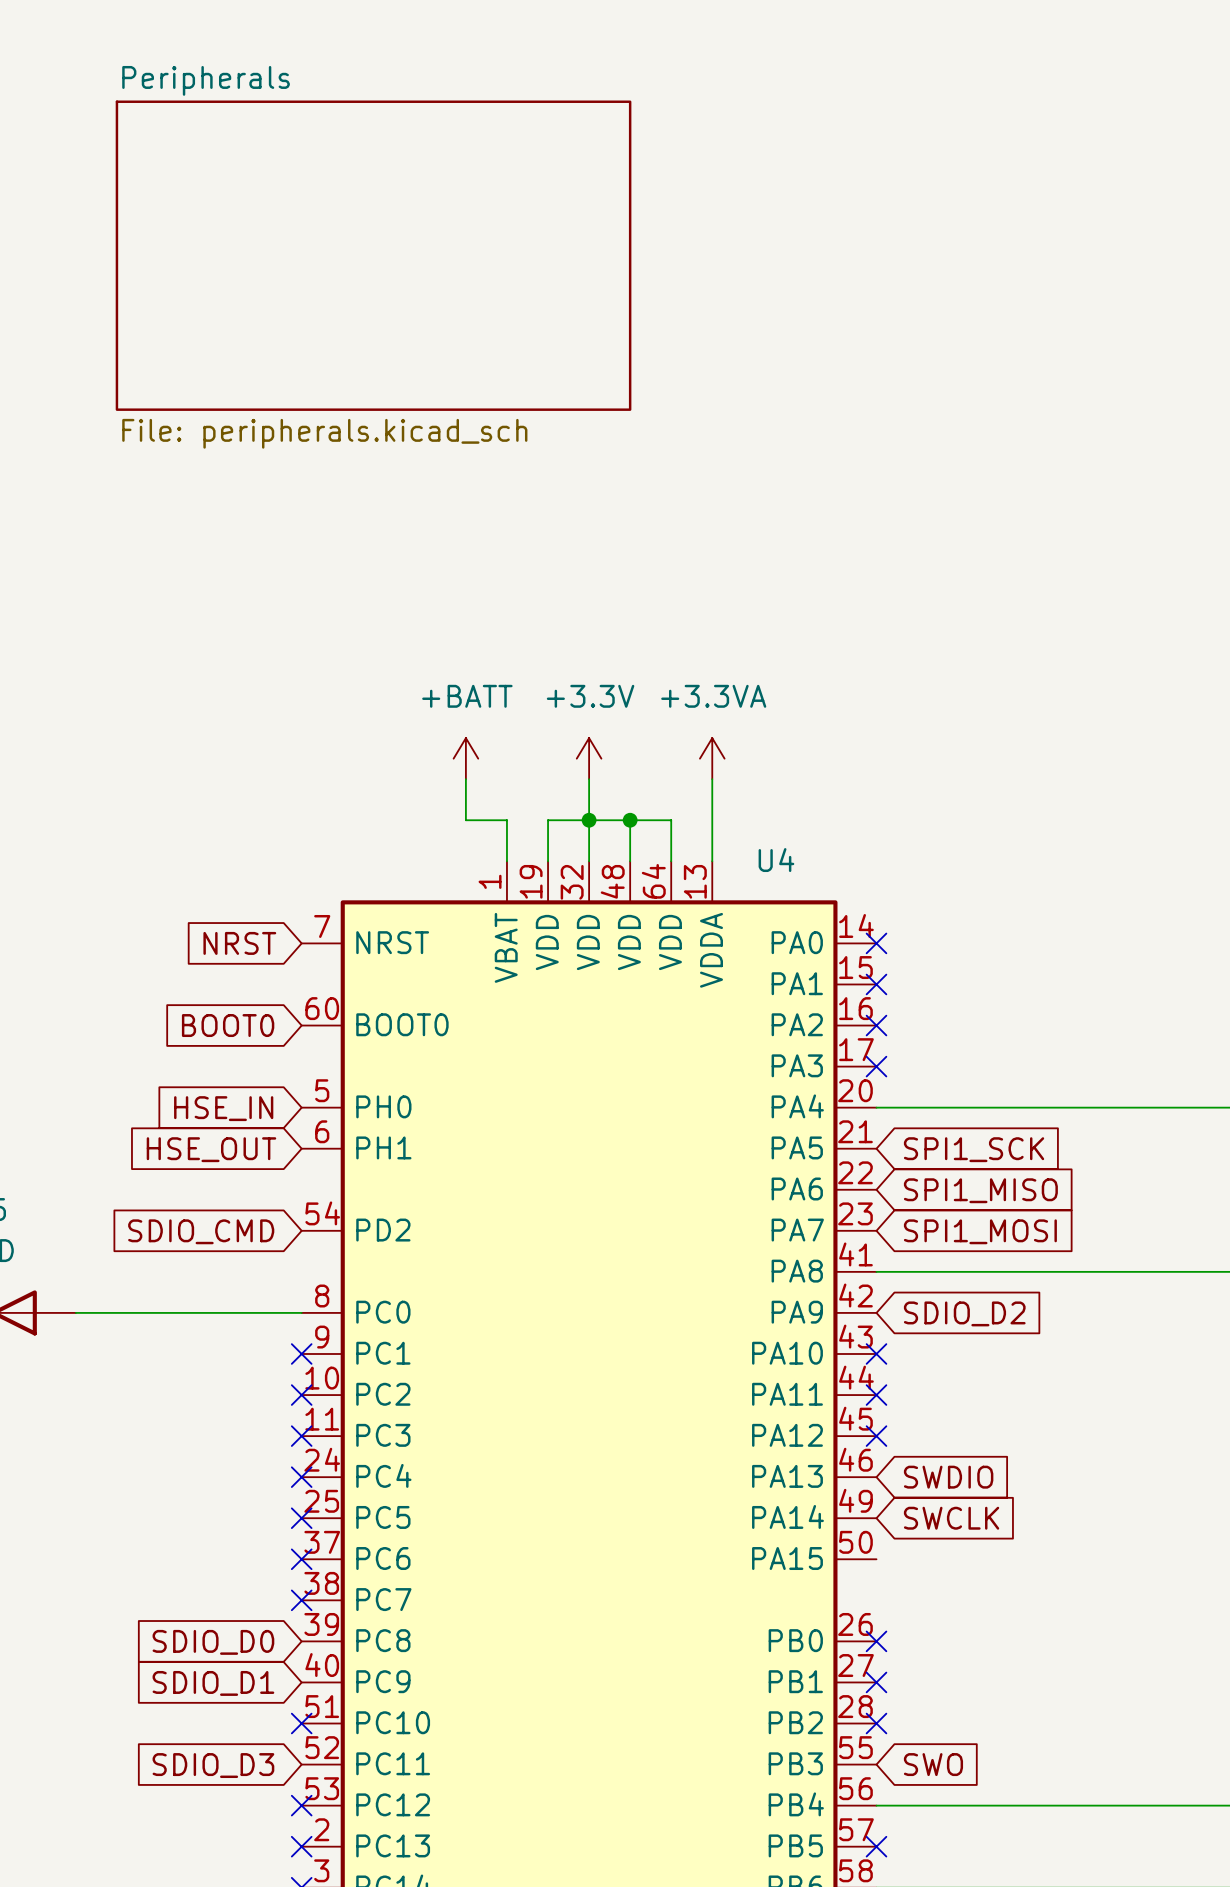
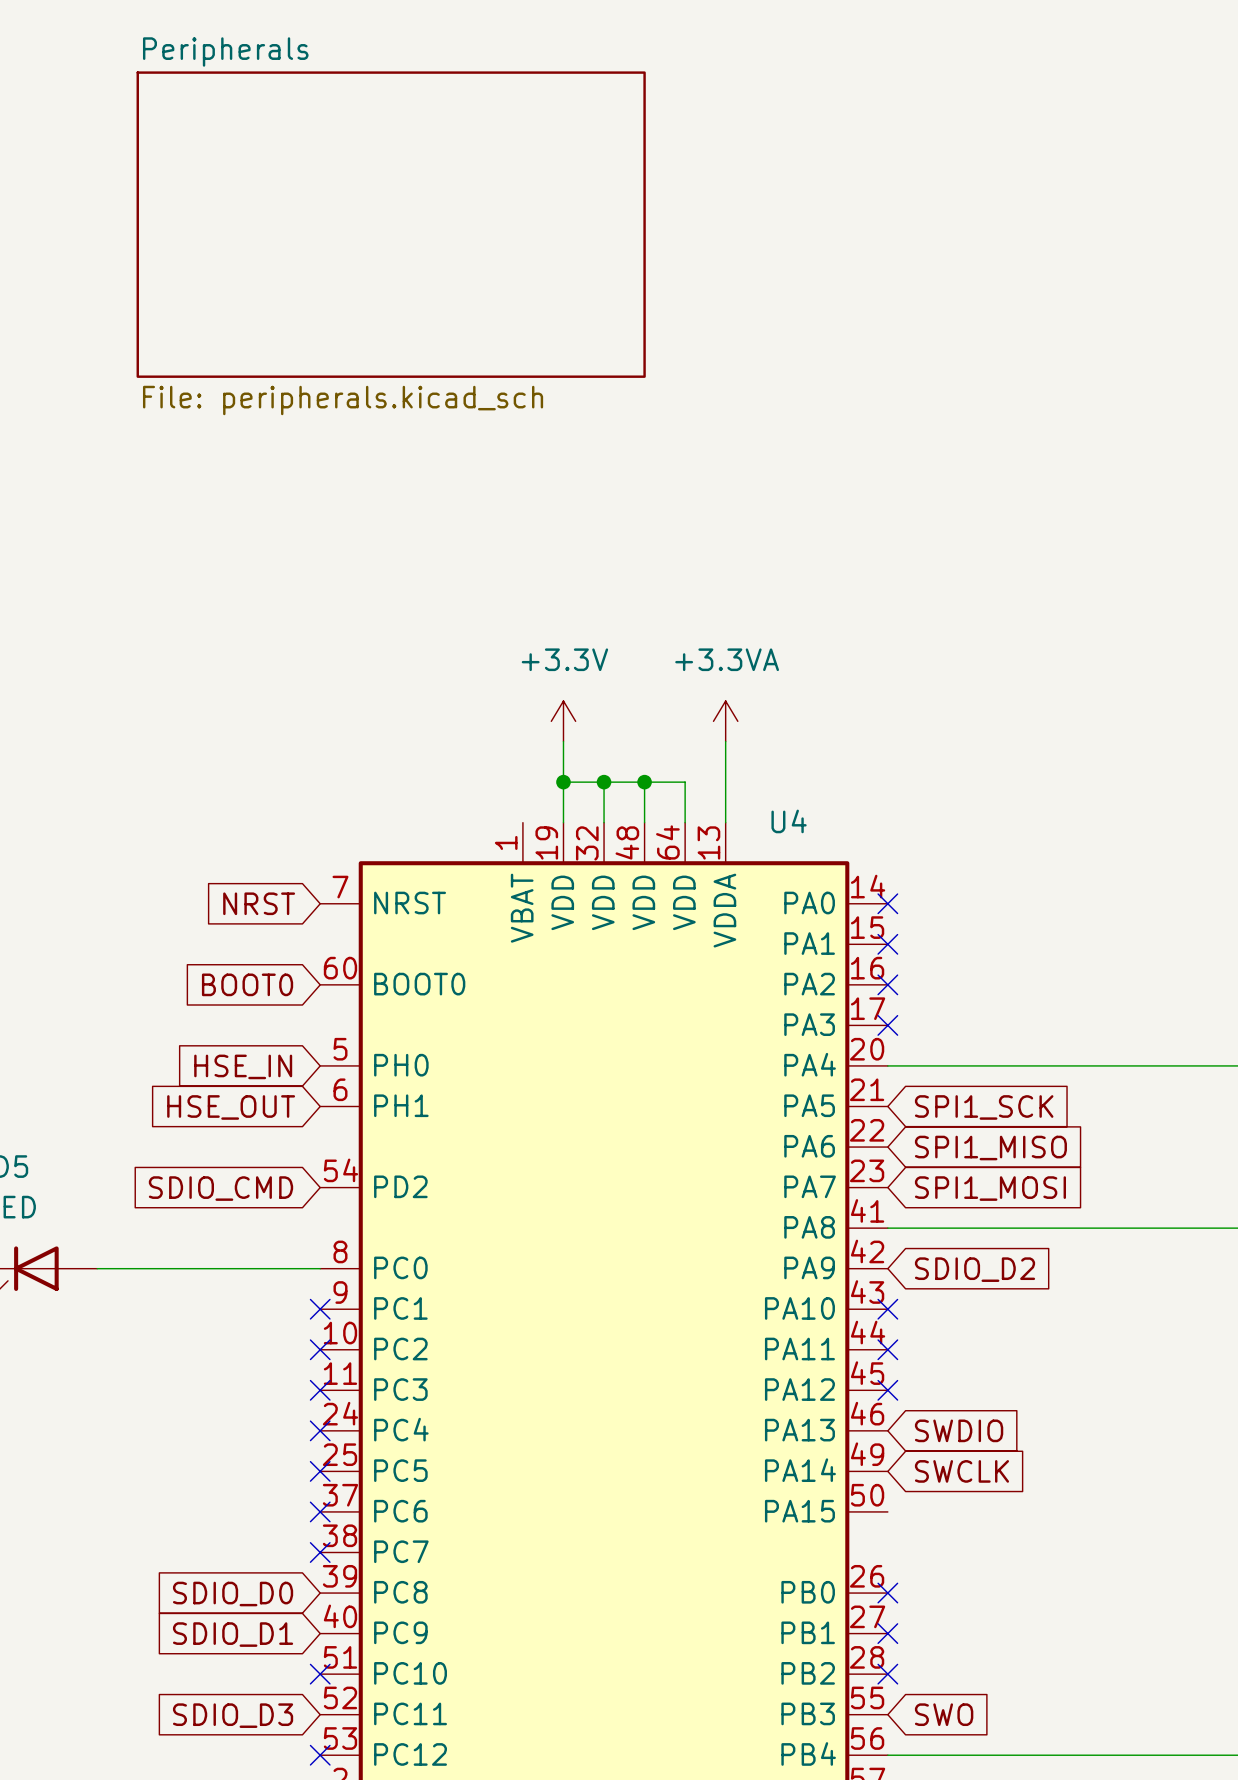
power symbol: +BATT (465, 758) -> none
power symbol position: +3.3V (589, 758) -> +3.3V (563, 721)
wire: (465, 779) (465, 820) (506, 820) (506, 861) -> none
wire: (589, 779) (589, 820) -> (563, 741) (563, 782)
junction: none -> (563, 782)

